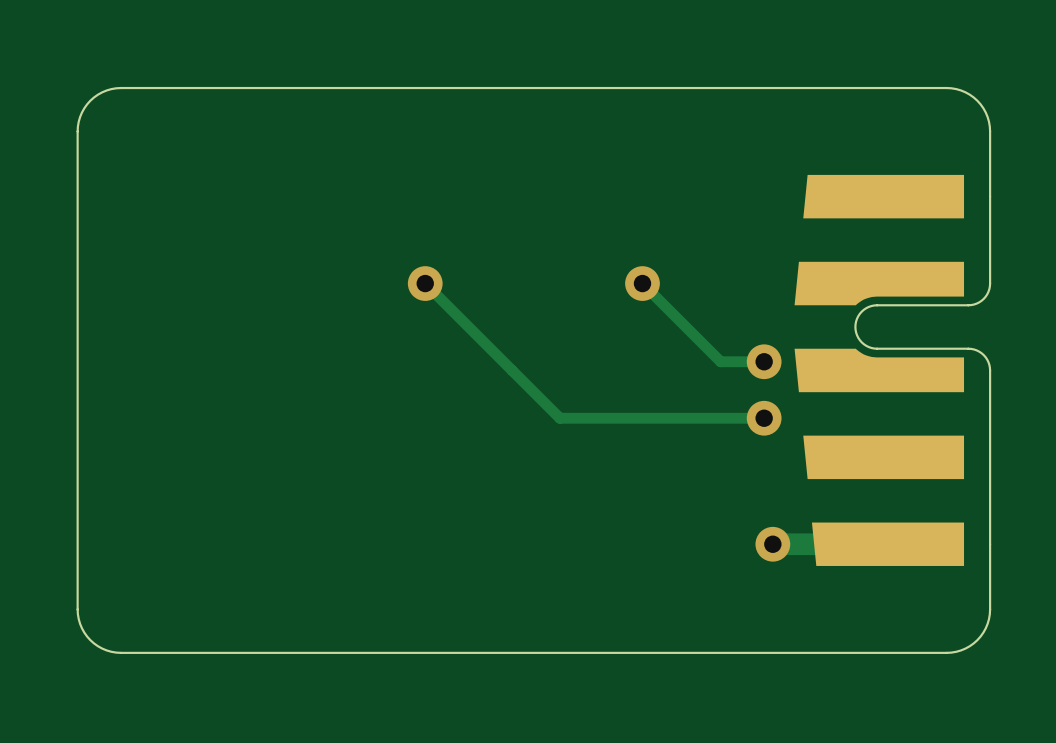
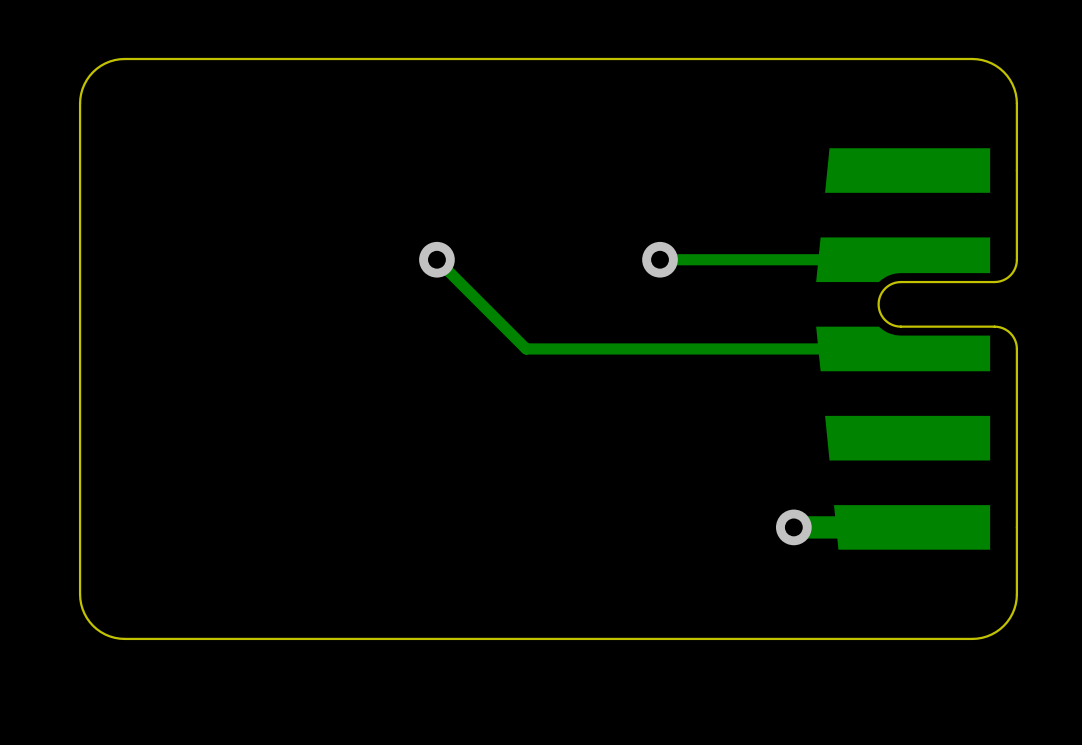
track: (642, 283) (720, 361) (764, 361) -> (660, 259) (923, 259)
via: (764, 361) -> none
track: (512, 370) (559, 418) (764, 418) -> (526, 348) (923, 348)
via: (764, 418) -> none

